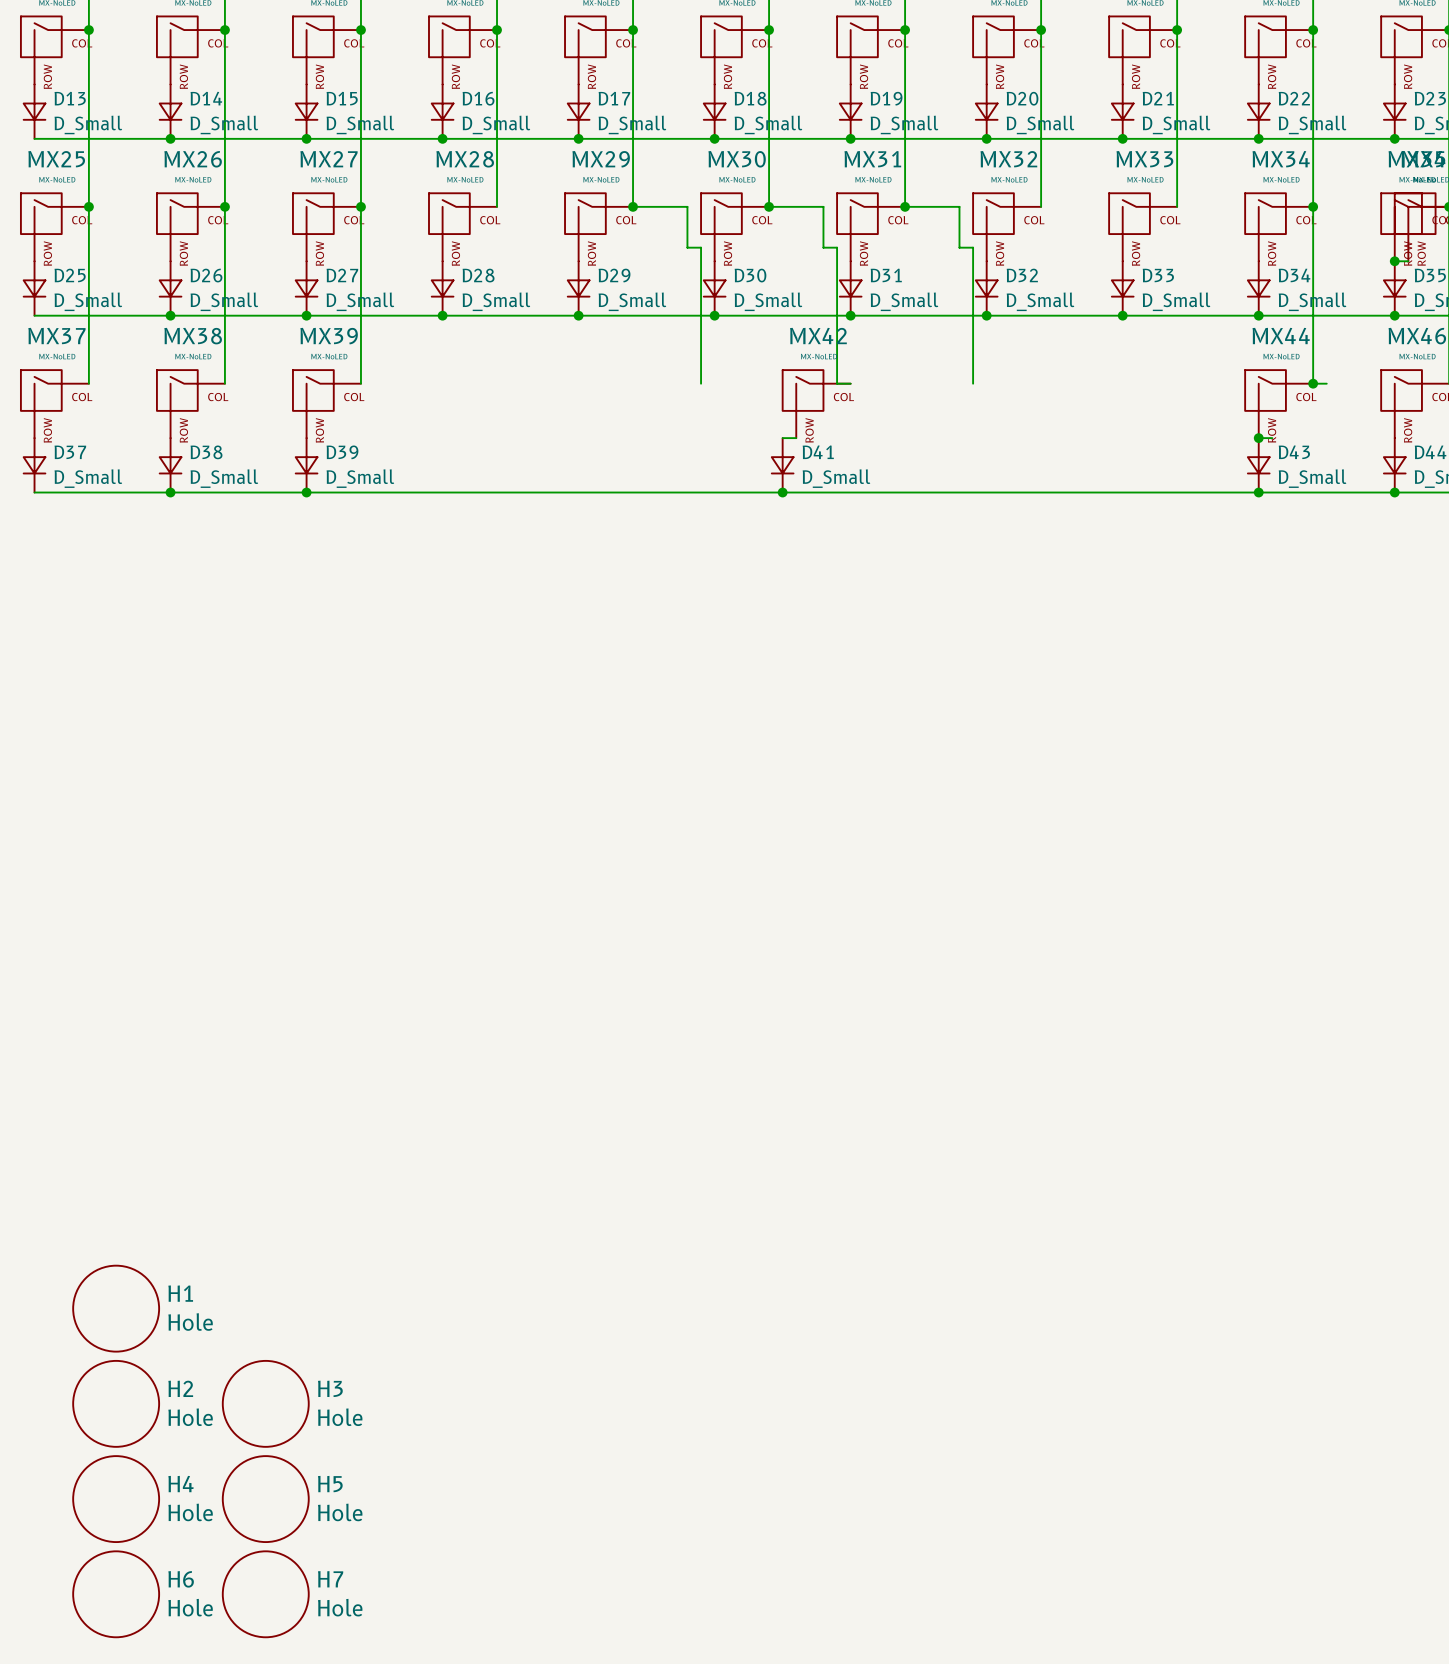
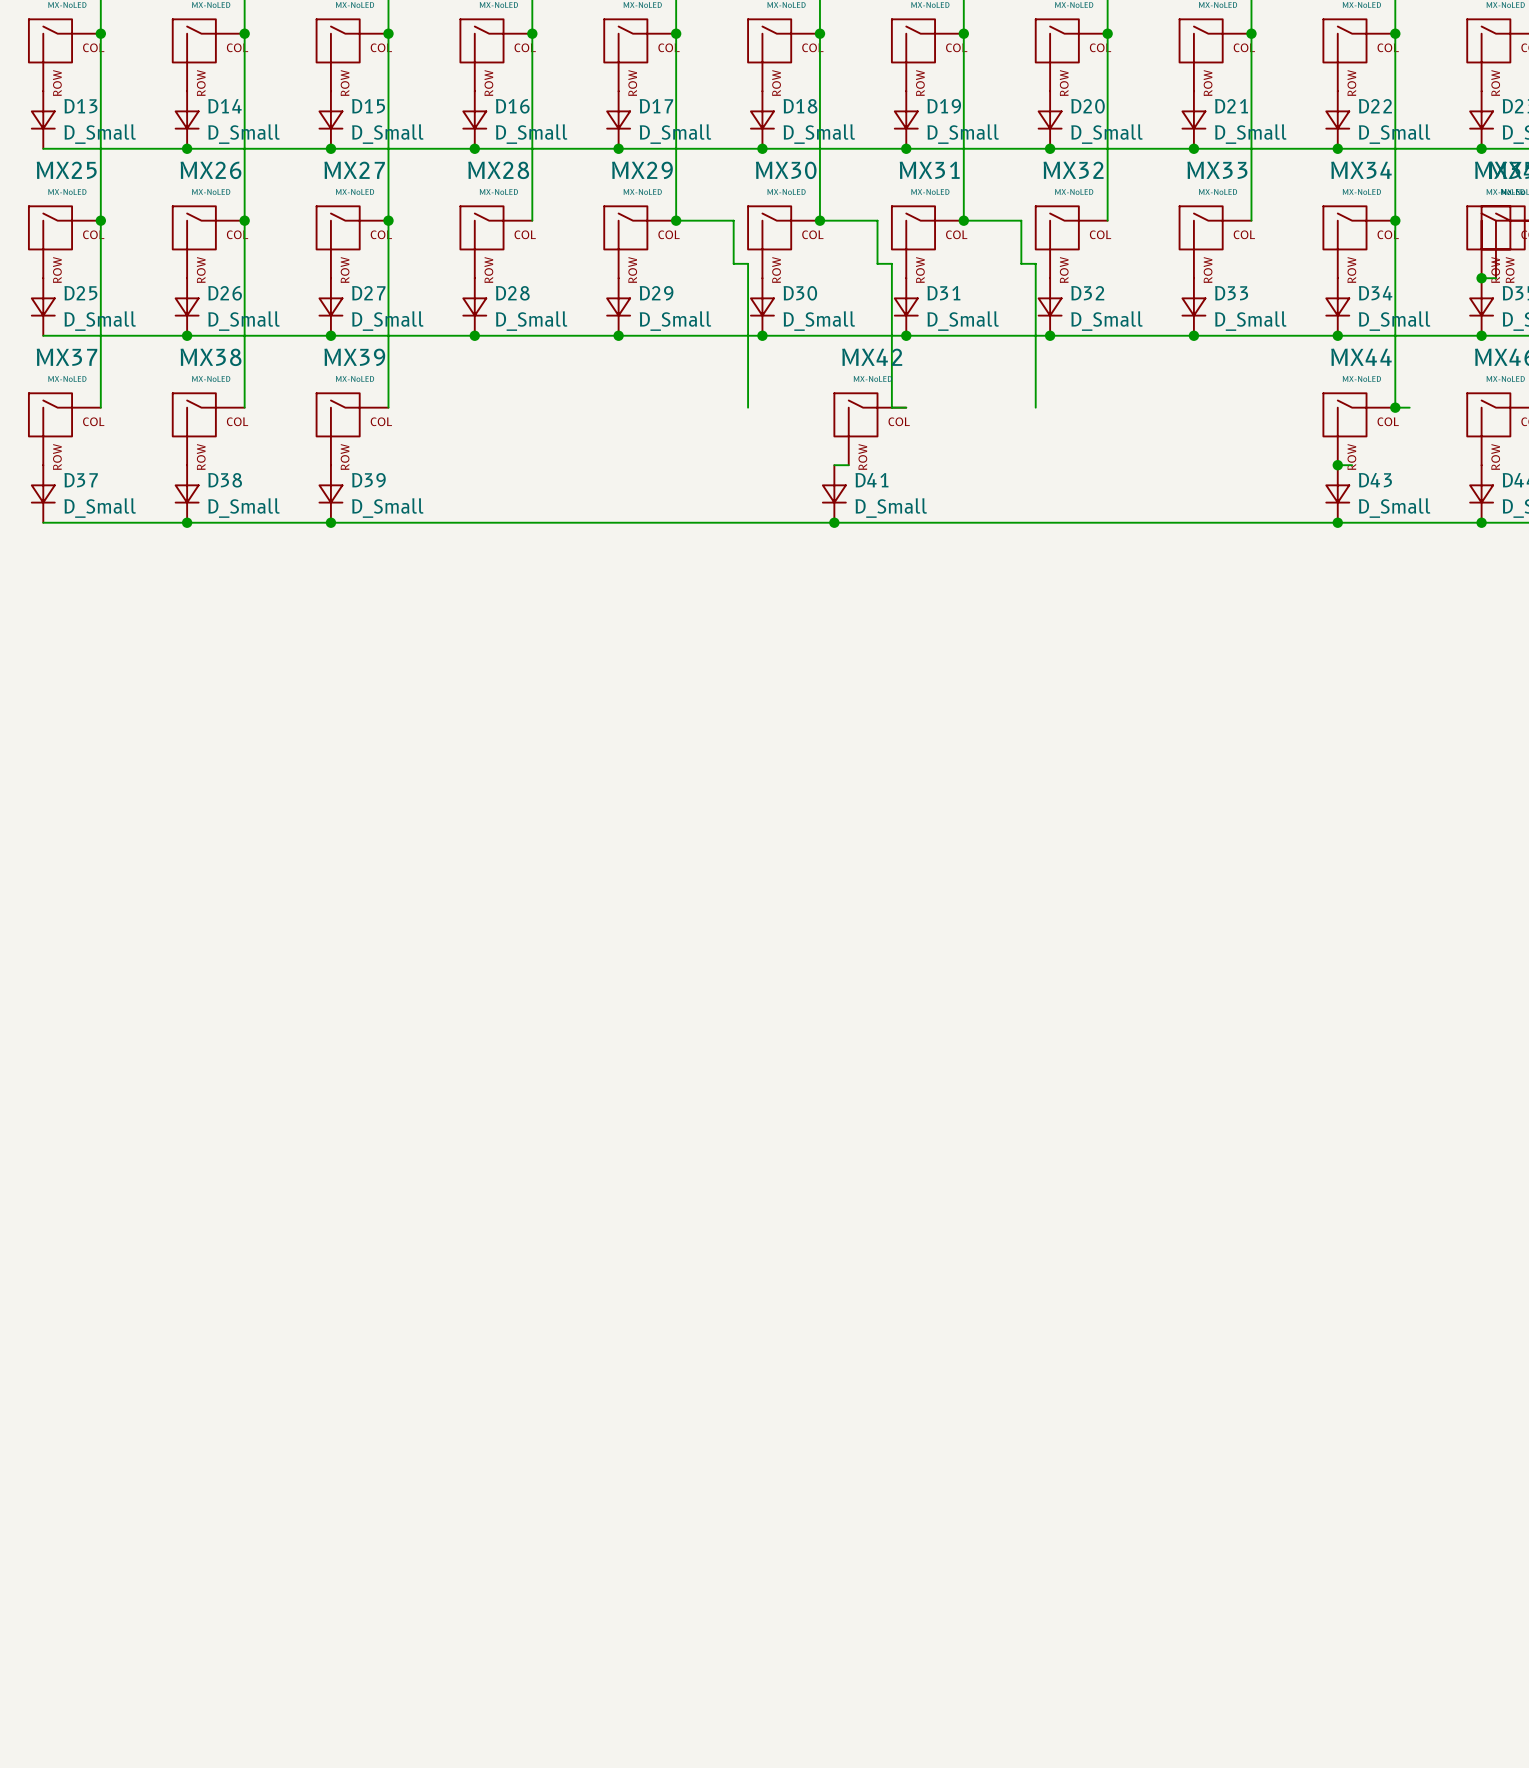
H1: Hole (116, 1308) -> none
H2: Hole (116, 1403) -> none
H3: Hole (265, 1403) -> none
H4: Hole (116, 1499) -> none
H5: Hole (265, 1499) -> none
H6: Hole (116, 1594) -> none
H7: Hole (265, 1594) -> none

